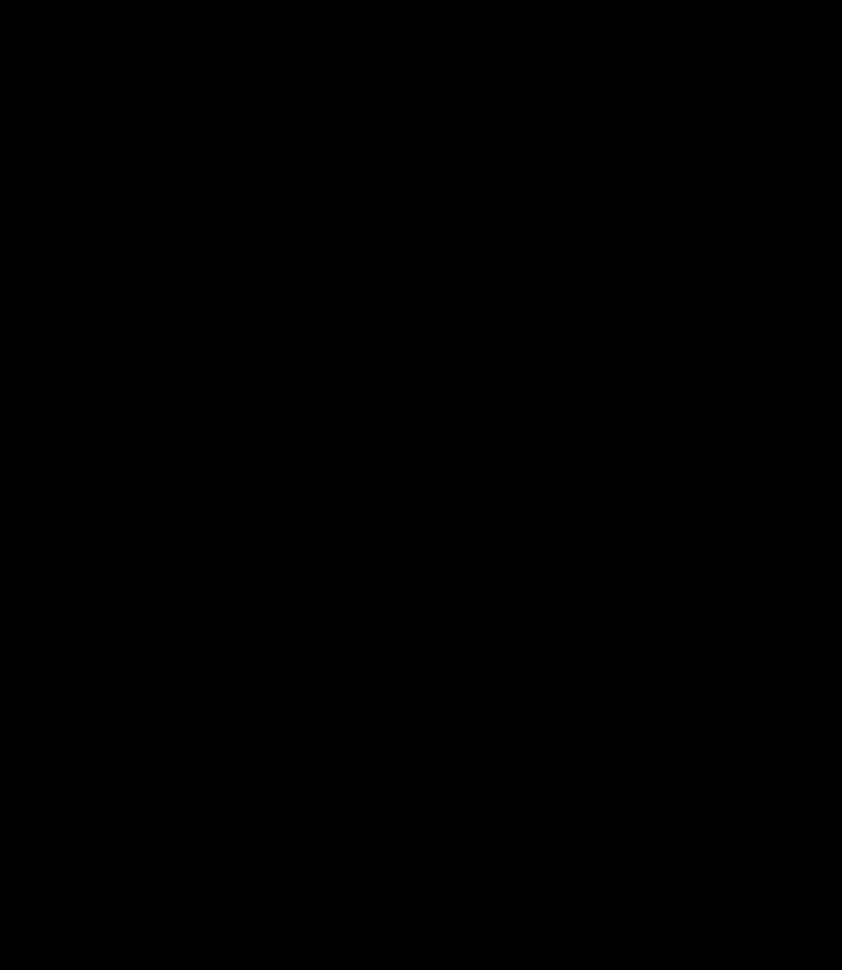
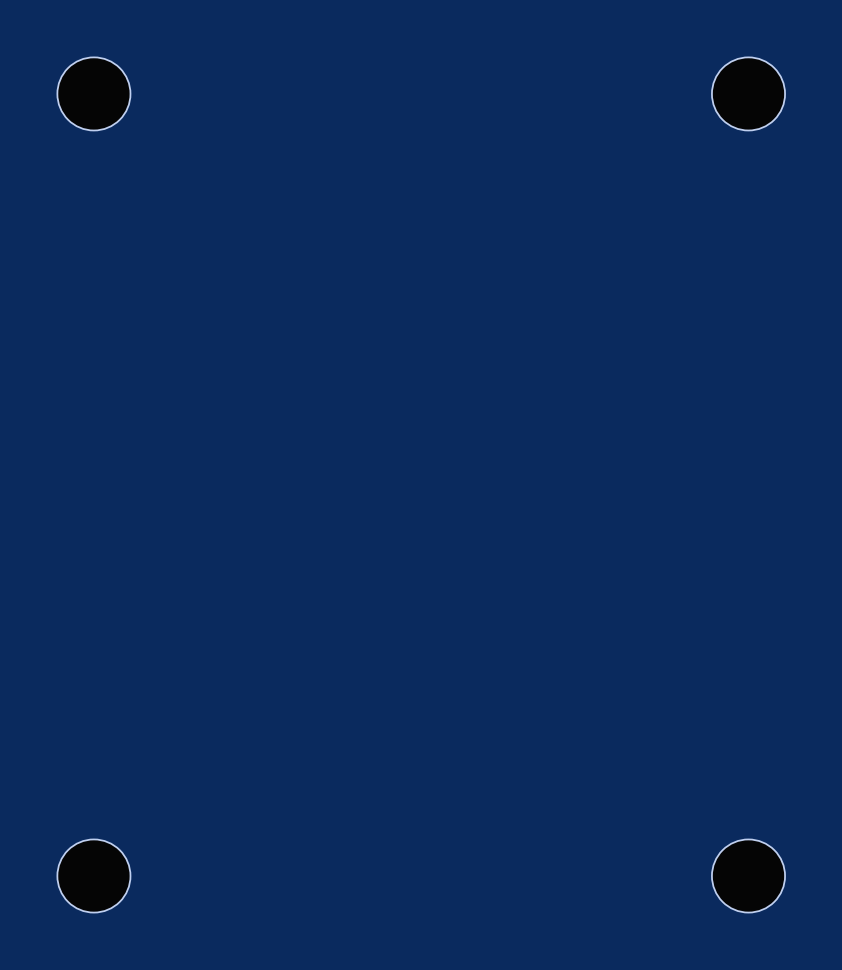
part: none -> (93, 93)
part: none -> (748, 93)
part: none -> (93, 876)
part: none -> (748, 876)

